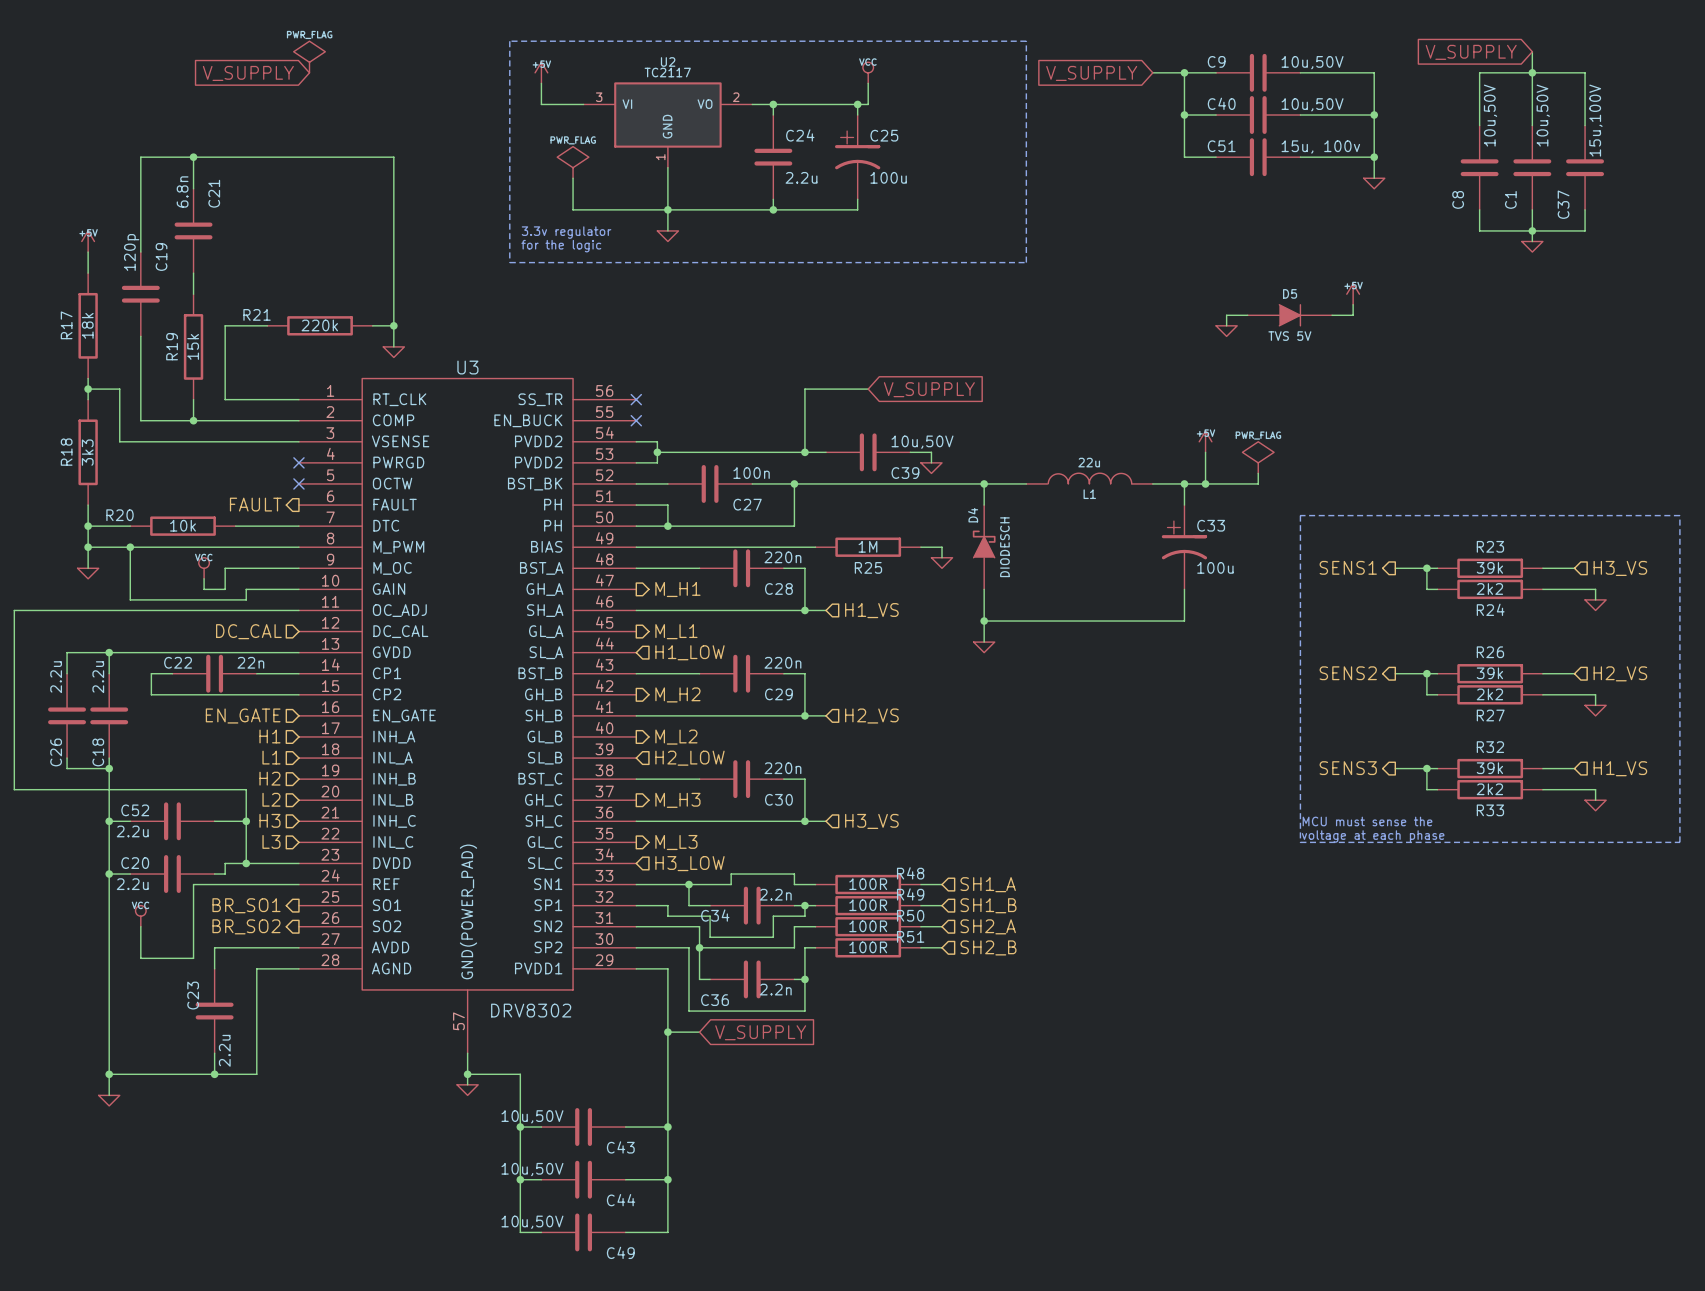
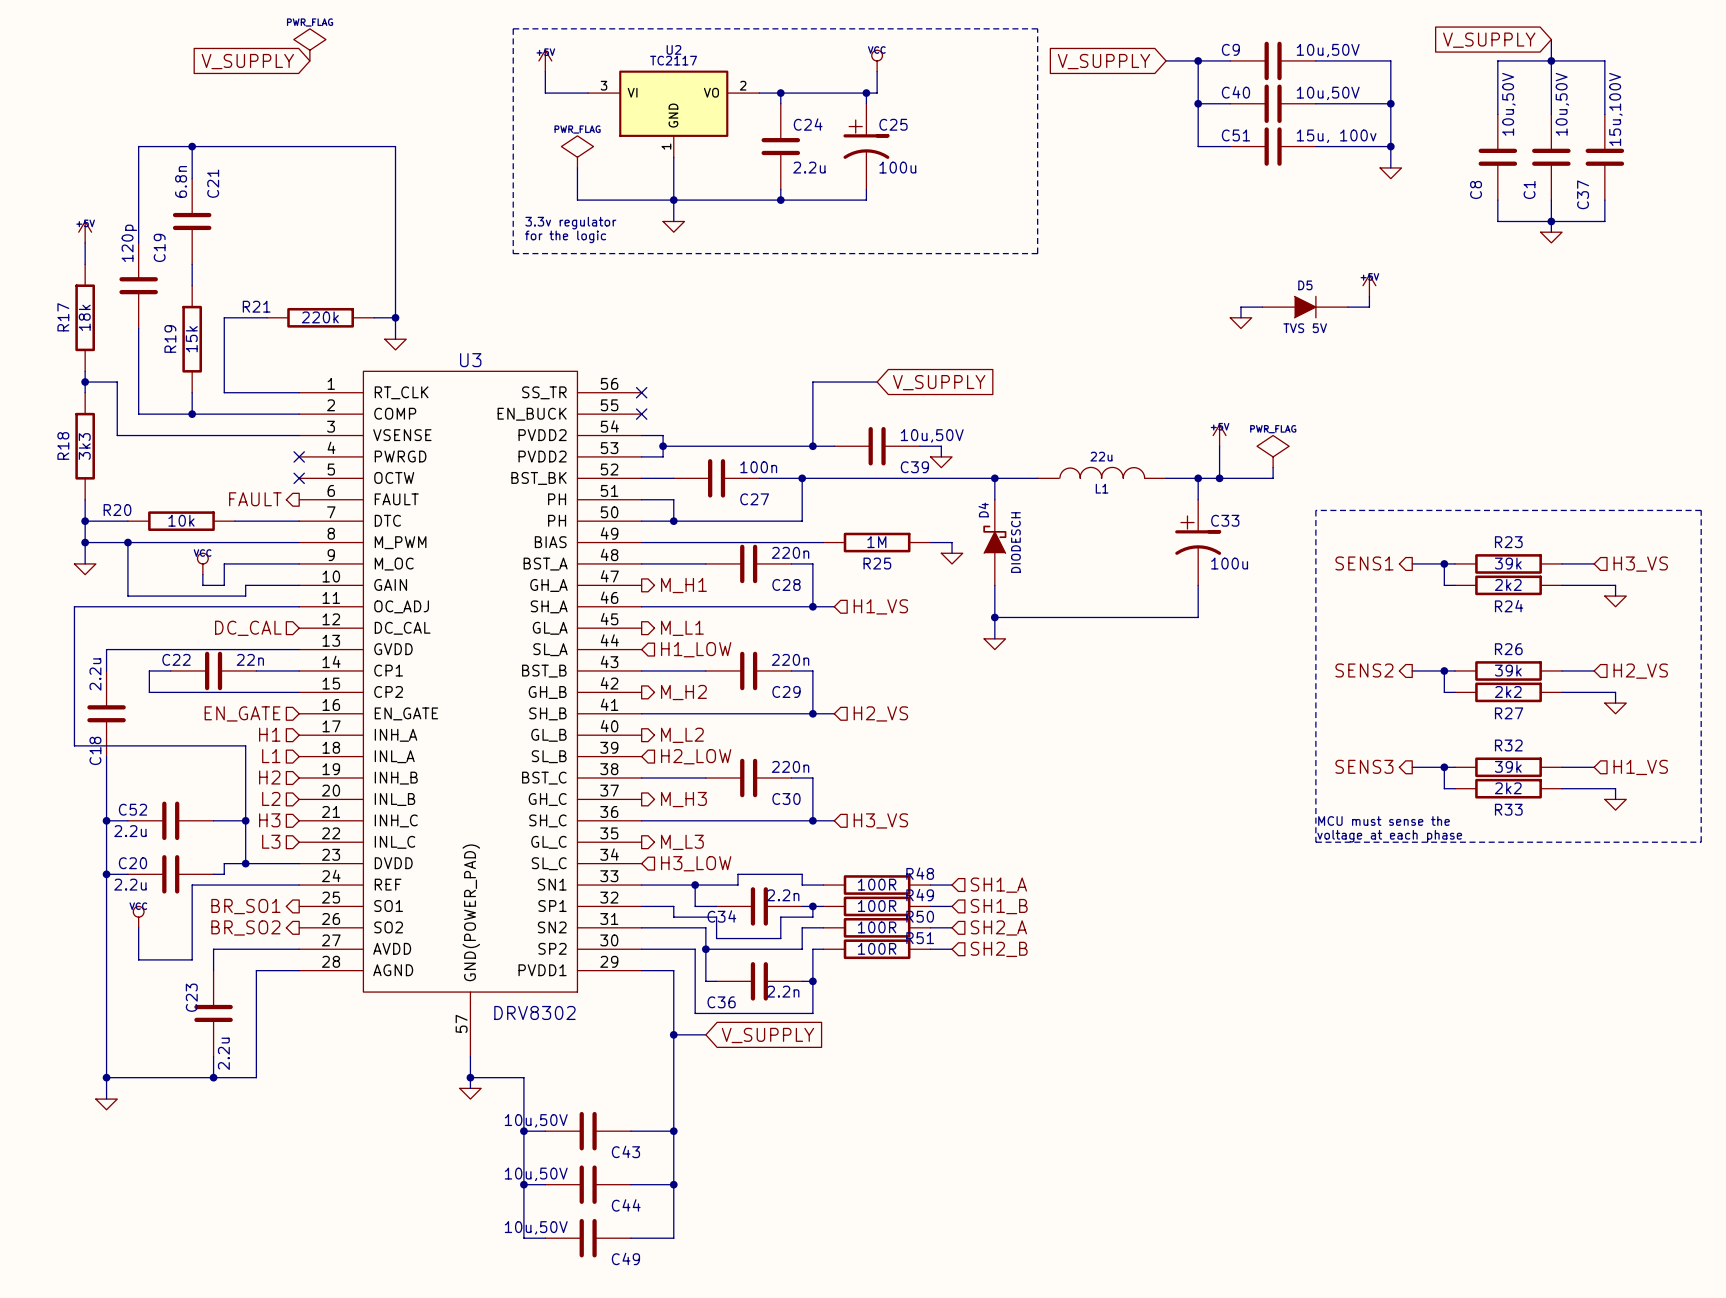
wire: (77, 610) (14, 610) (14, 789) (246, 789) -> (74, 606) (74, 745) (245, 745) (245, 788)
wire: (109, 652) (67, 652) (67, 673) -> none
junction: (109, 652) -> none
C26: 2.2u (67, 715) -> none
wire: (67, 758) (67, 768) (109, 768) -> none
junction: (109, 768) -> none

